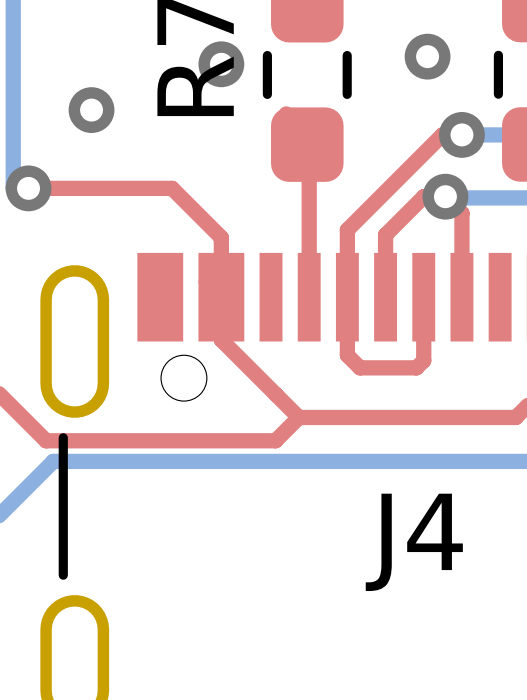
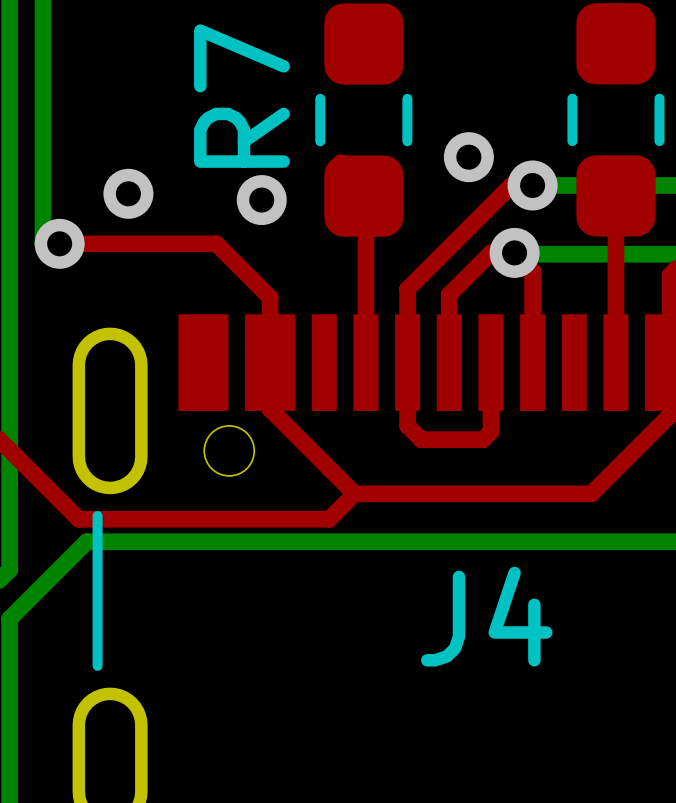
via position: (427, 56) -> (468, 157)
via: (221, 64) -> none
via position: (91, 110) -> (128, 193)
via: none -> (261, 200)

